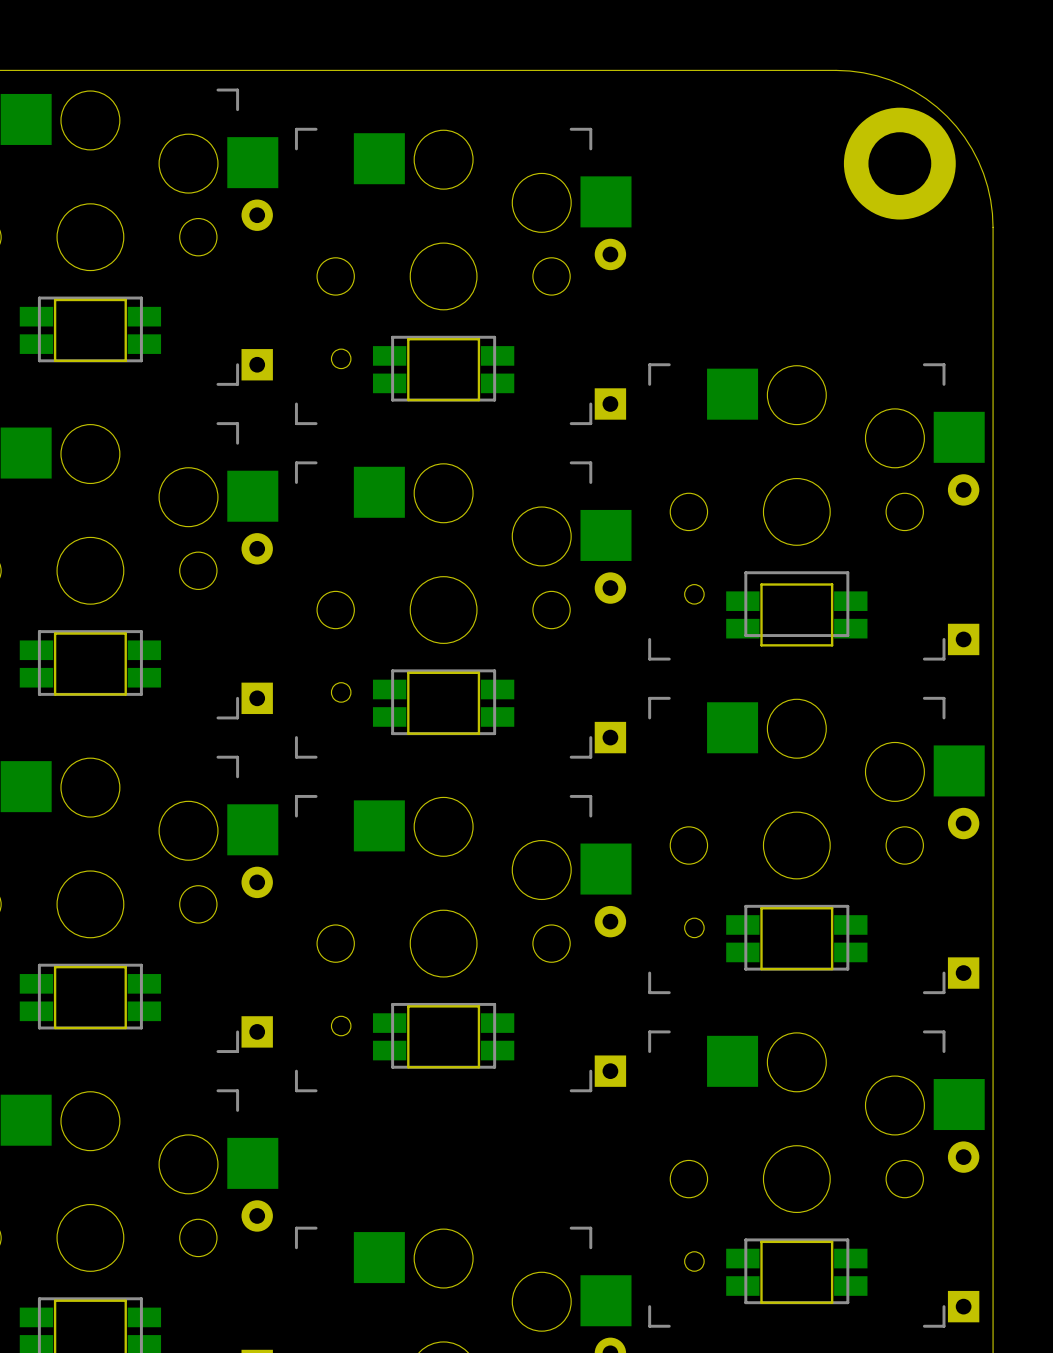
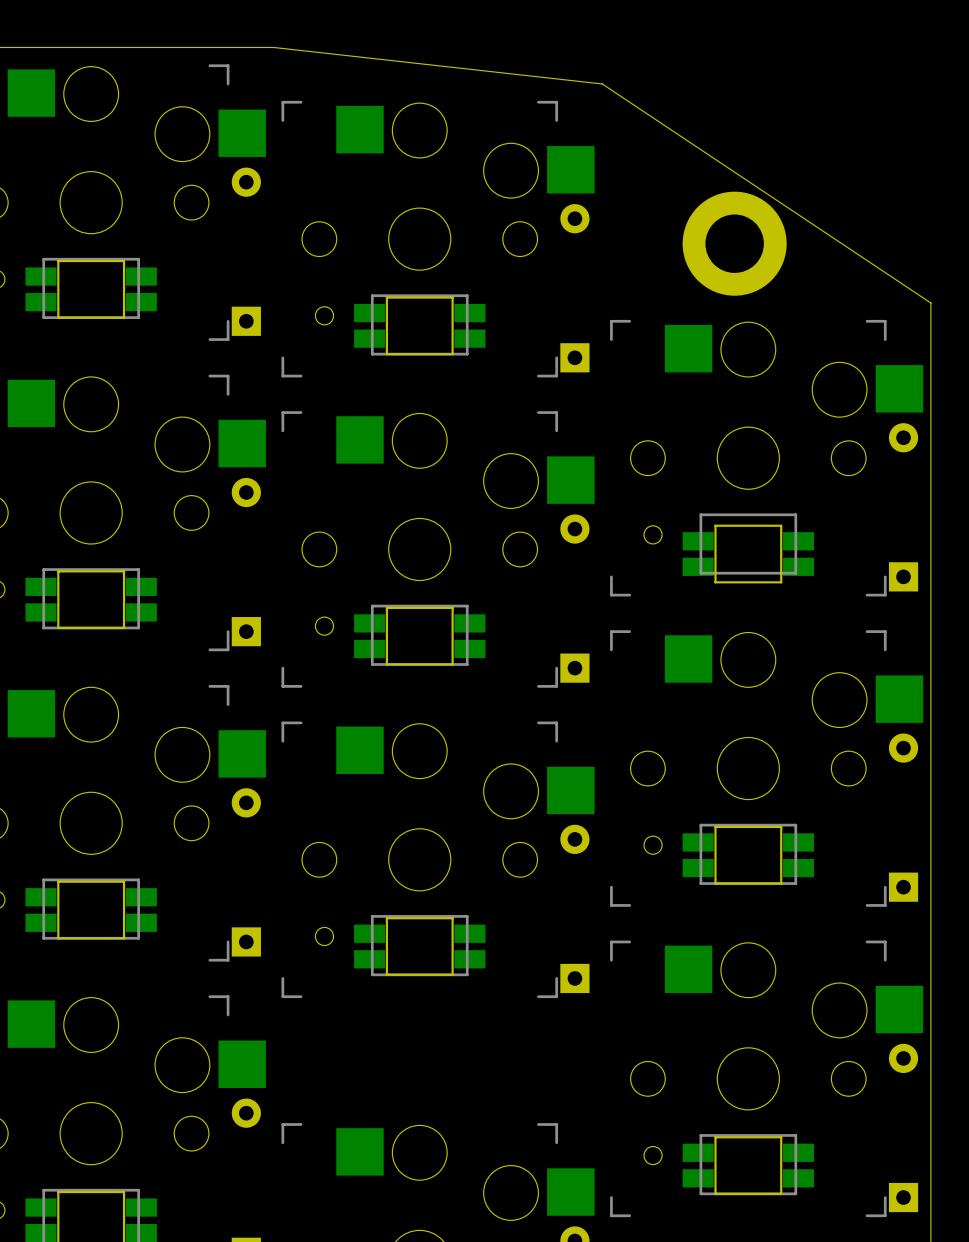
board edge: (286, 70) (836, 70) (863, 72) (889, 79) (926, 98) (947, 116) (972, 148) (983, 173) (992, 213) (993, 345) -> (273, 47) (602, 83) (930, 303)
part position: (899, 163) -> (734, 243)

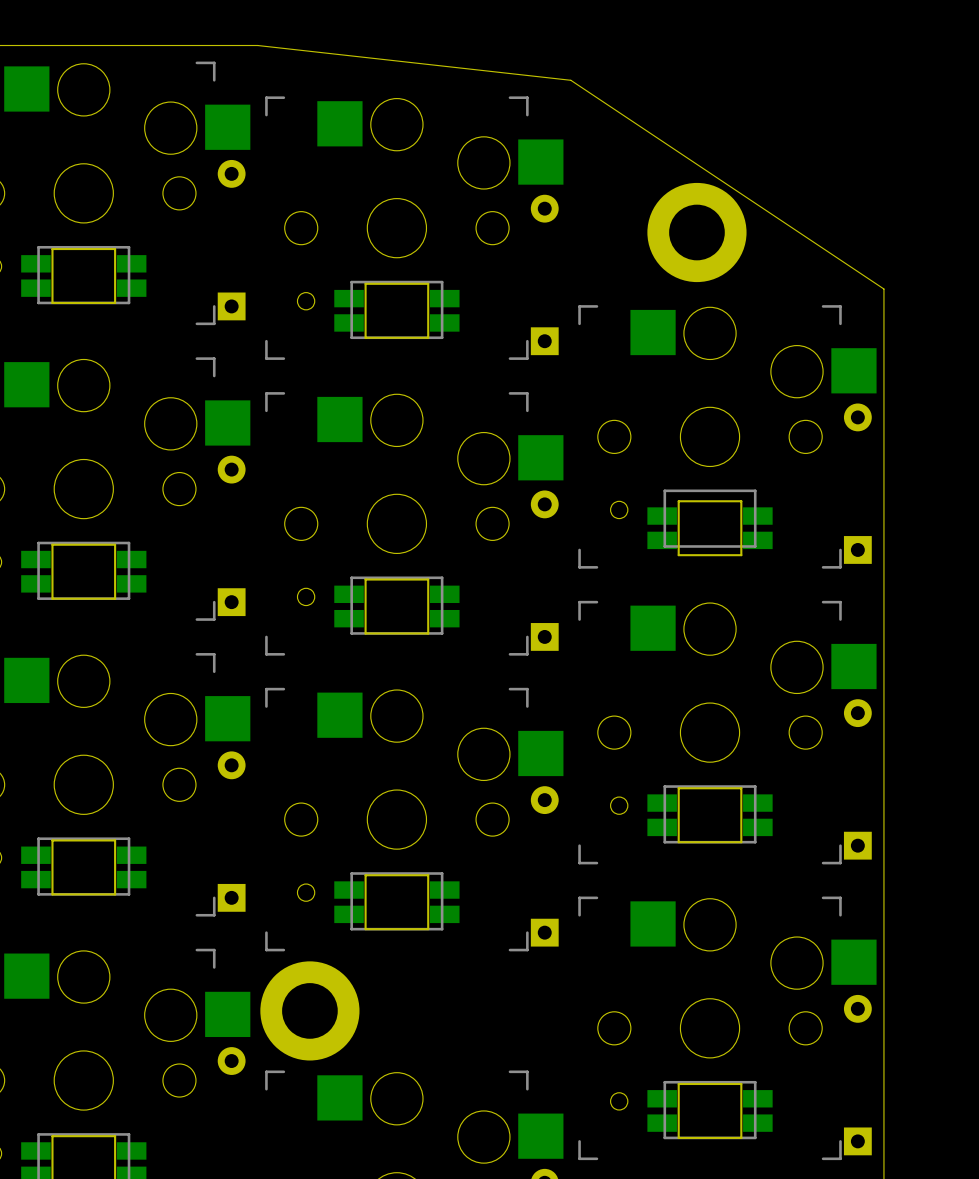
part: none -> (309, 1010)

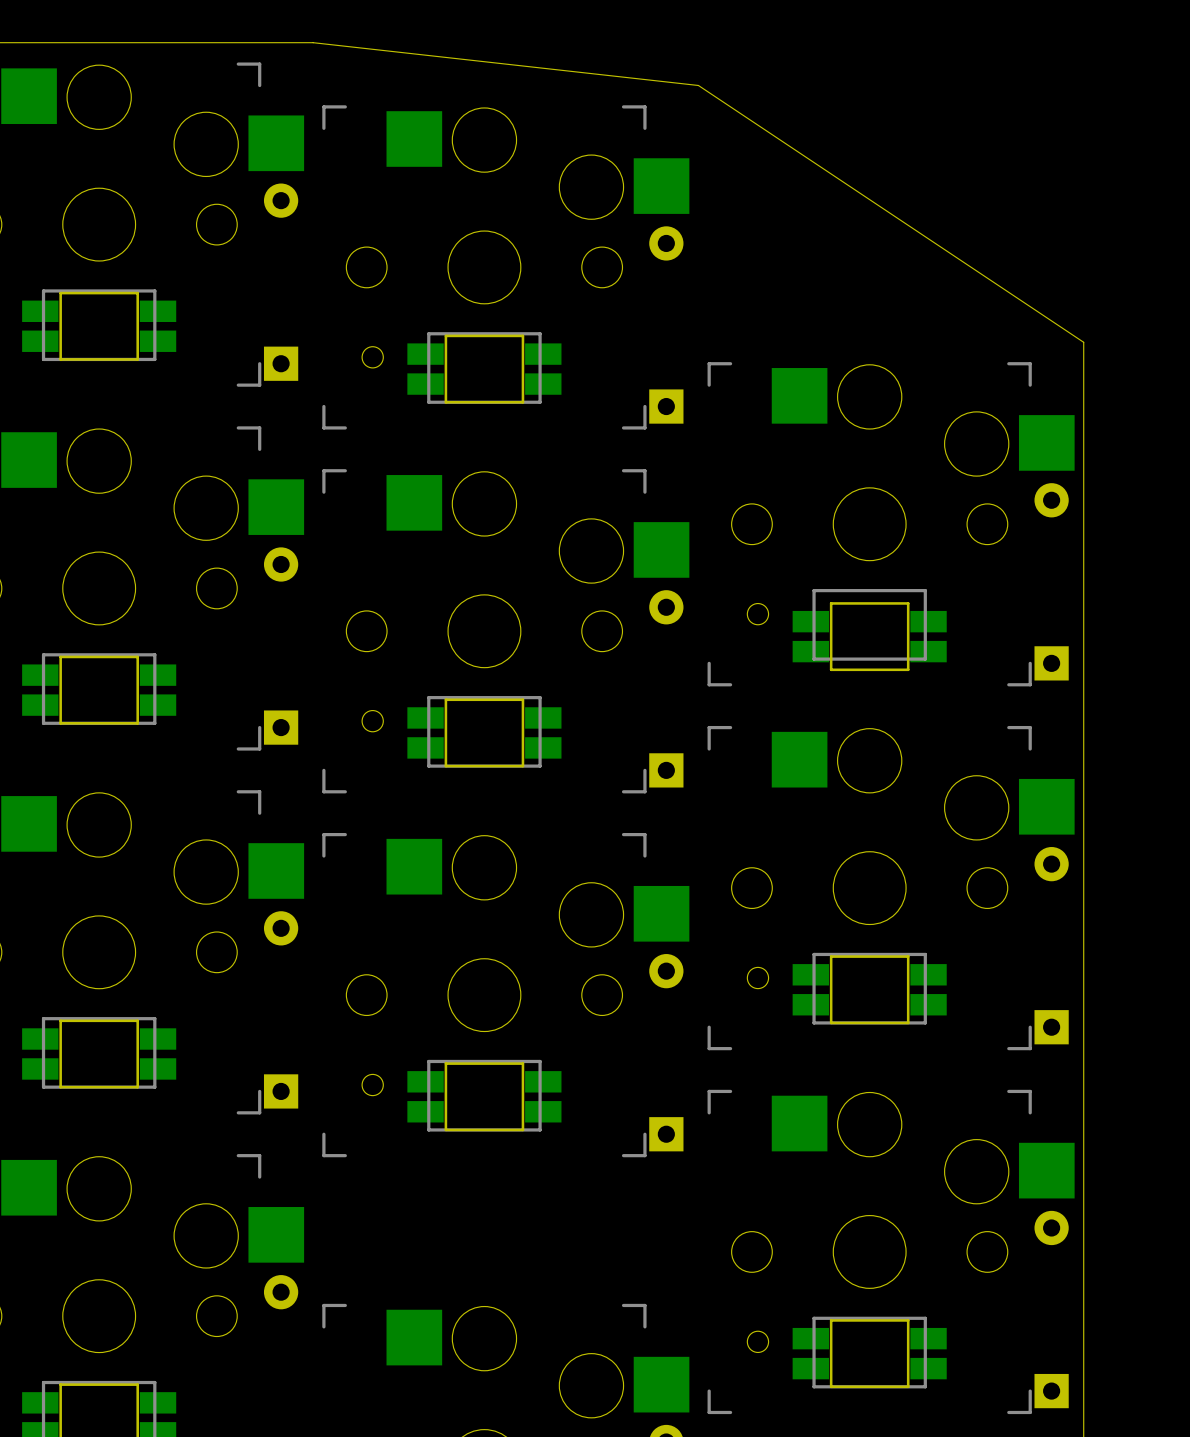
part: (696, 232) -> none
part: (309, 1010) -> none

